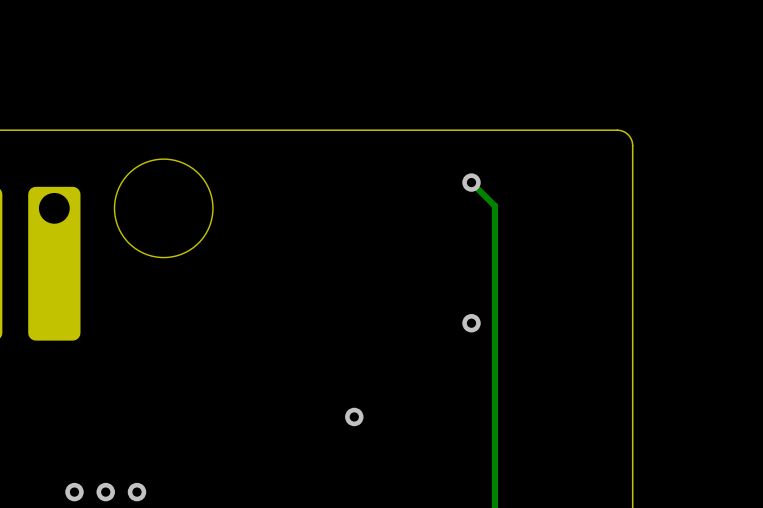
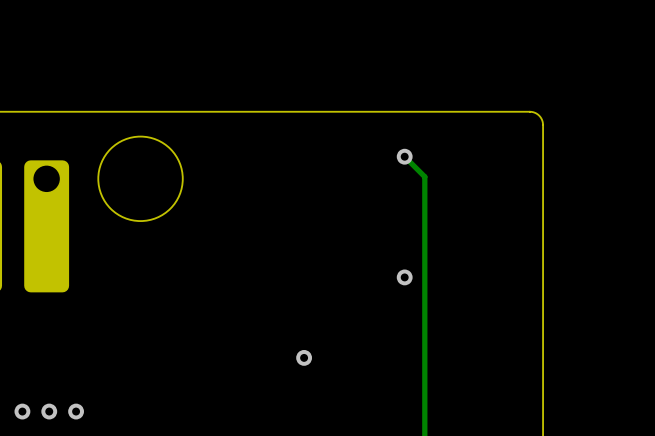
via: none -> (22, 411)
via: none -> (49, 411)
via: none -> (76, 411)
via: (74, 492) -> none
via: (105, 492) -> none
via: (136, 492) -> none

